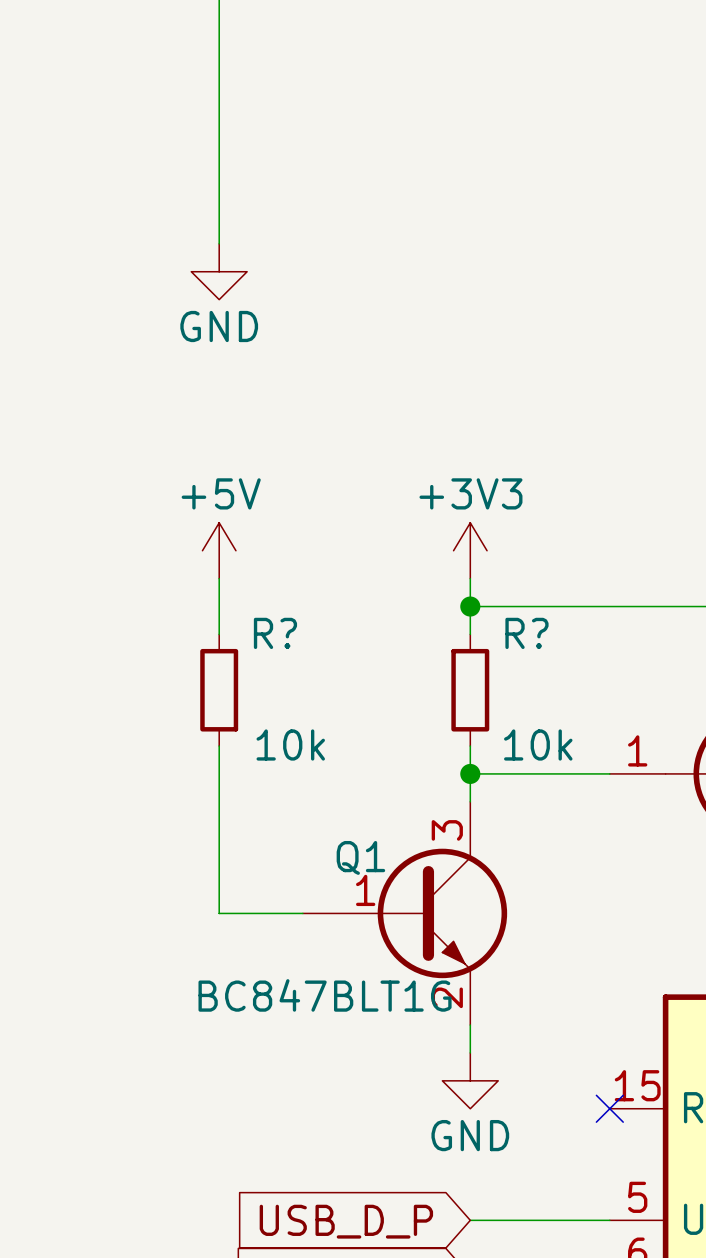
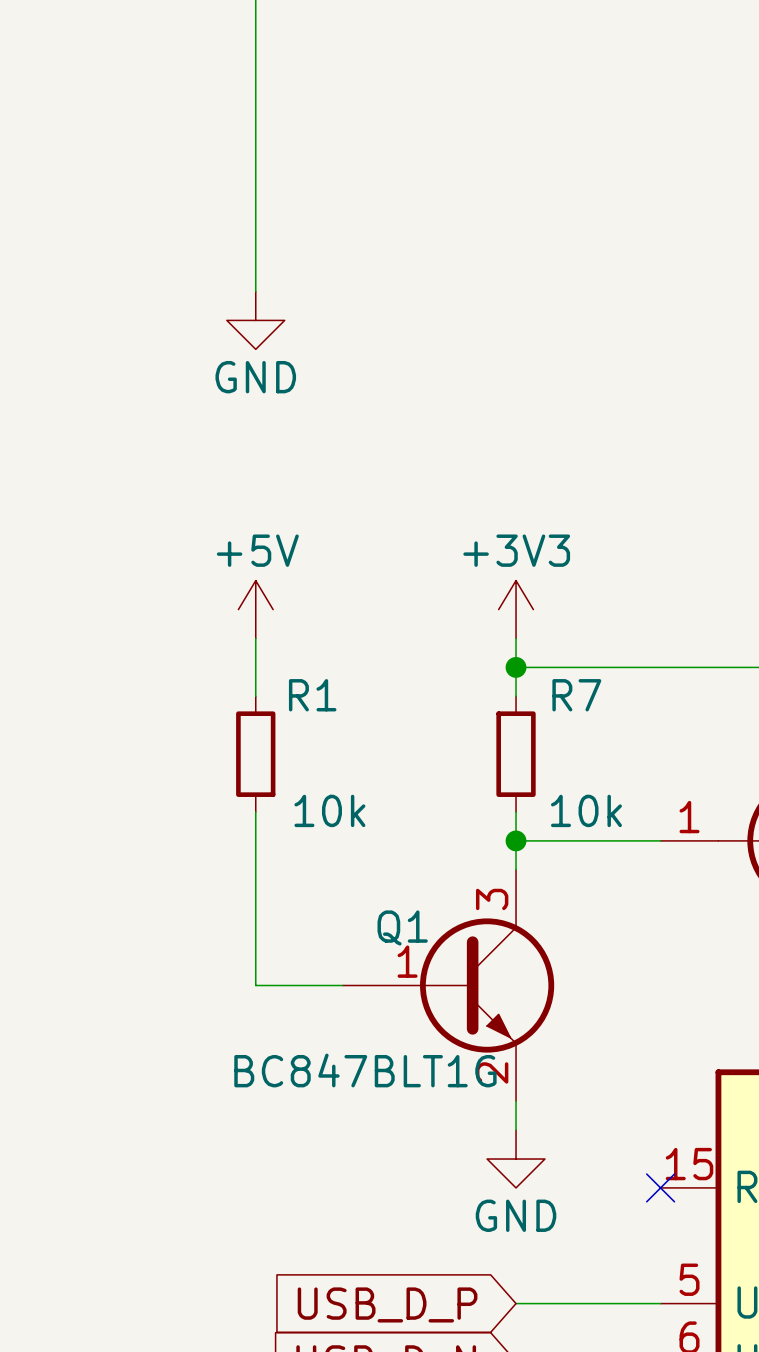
R? name: R? (275, 633) -> R1 (312, 695)
R? name: R? (526, 633) -> R7 (576, 695)

